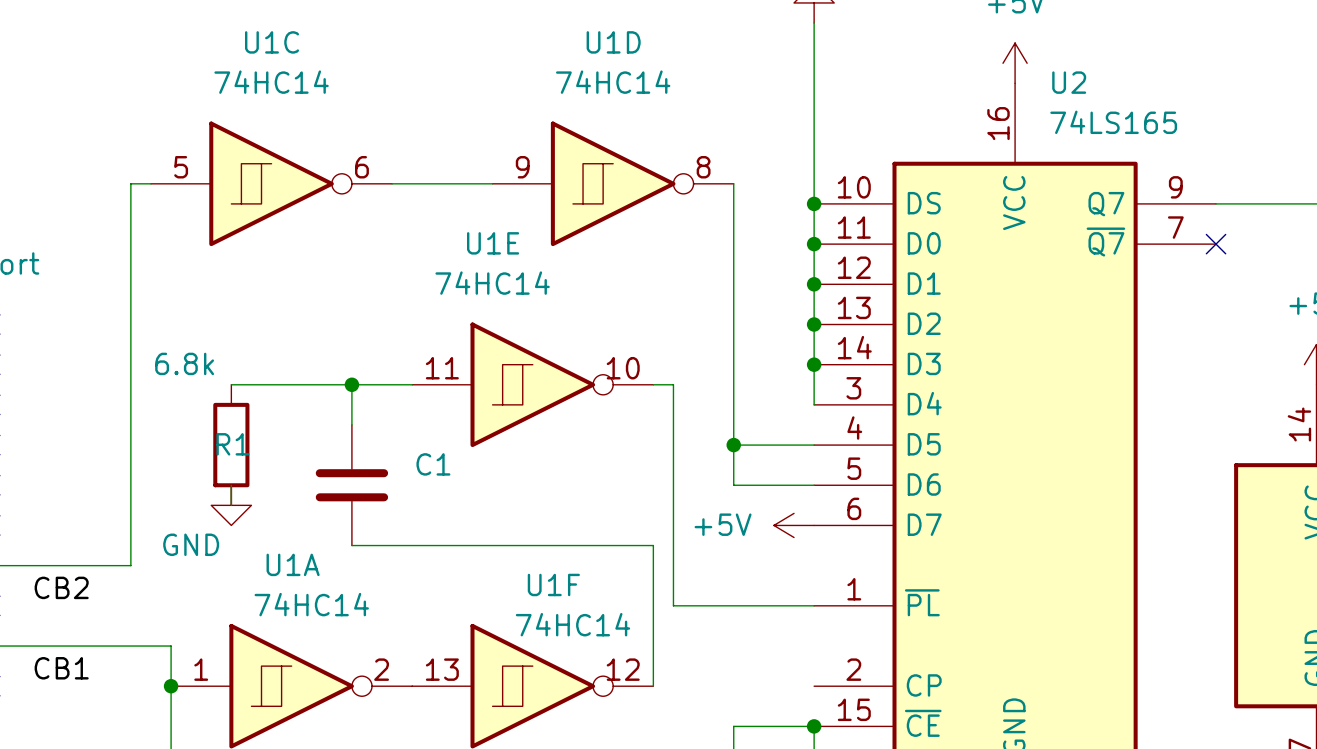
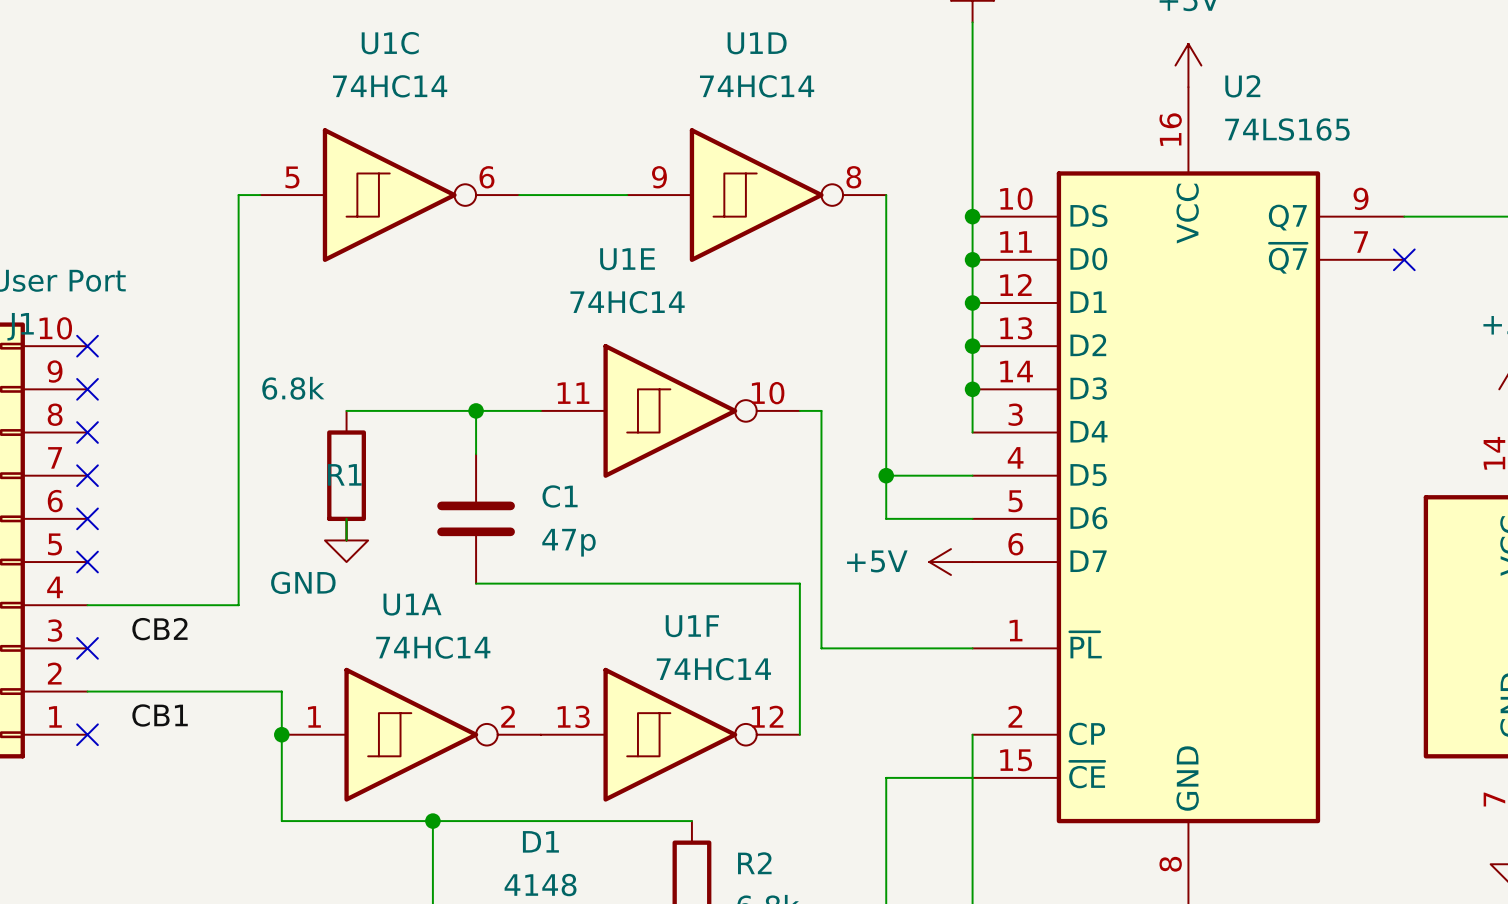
C1 value: none -> 47p (568, 542)
wire: none -> (972, 734) (972, 777)
junction: (814, 726) -> none

